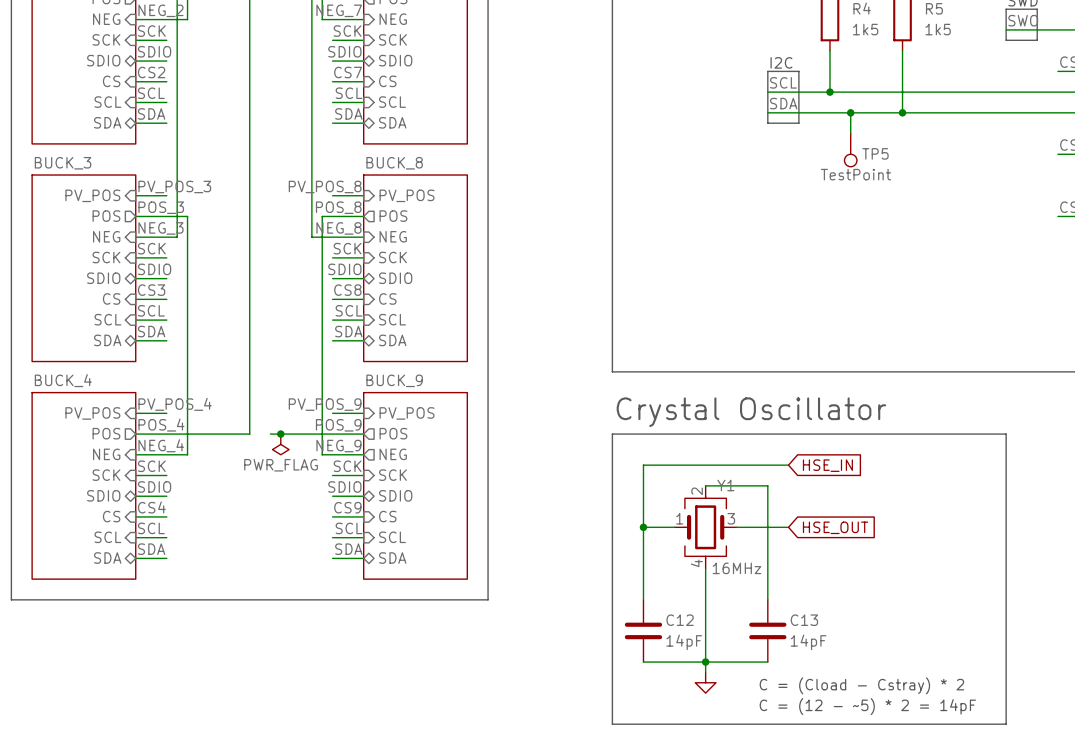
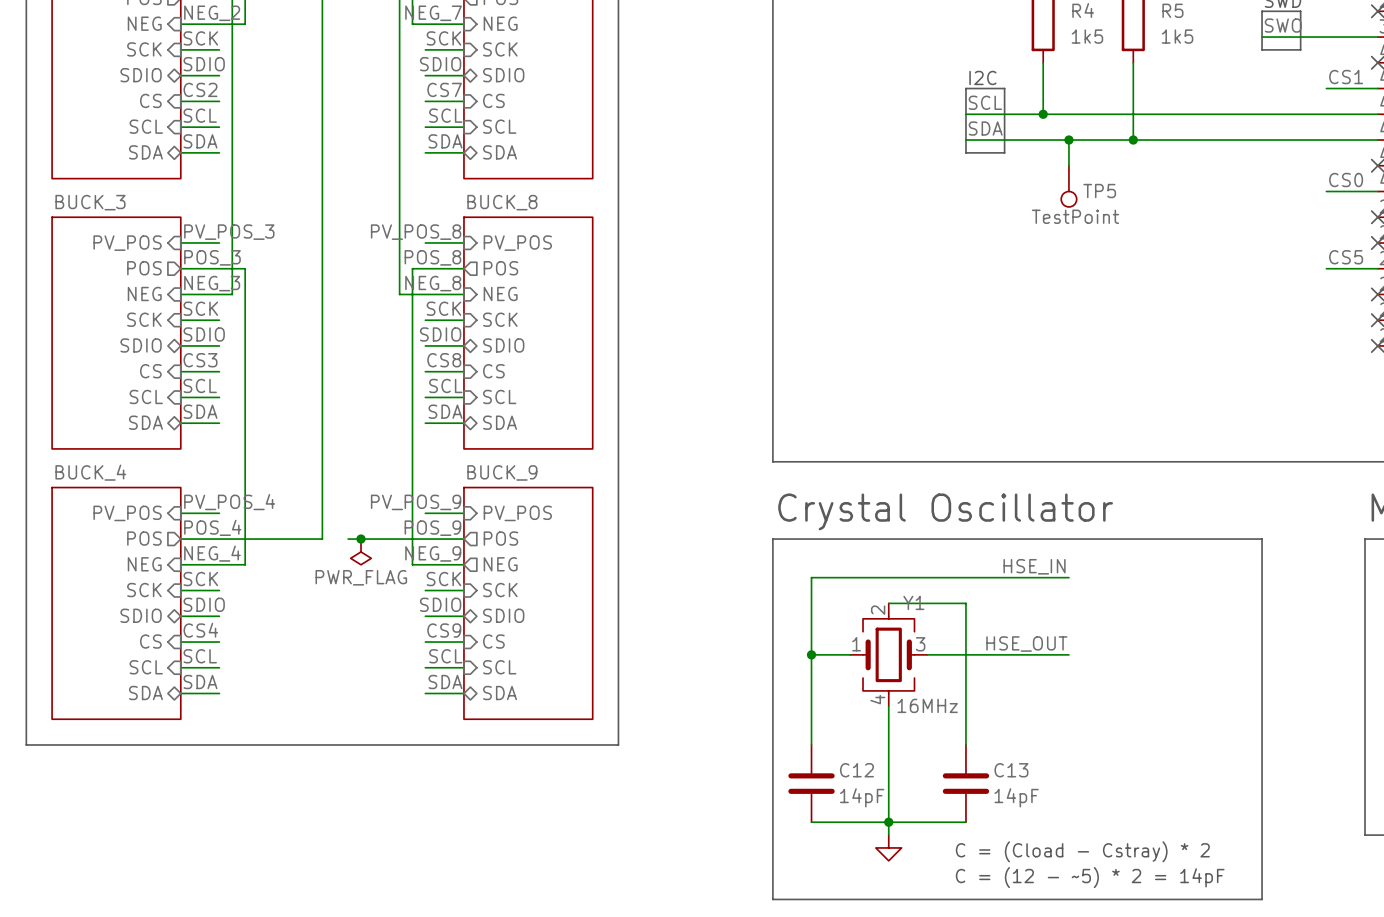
label: none -> HSE_IN (1034, 566)
wire: none -> (991, 577) (1068, 577)
global label: HSE_IN (827, 465) -> none
label: none -> HSE_OUT (1026, 644)
wire: none -> (991, 654) (1068, 654)
global label: HSE_OUT (835, 527) -> none

